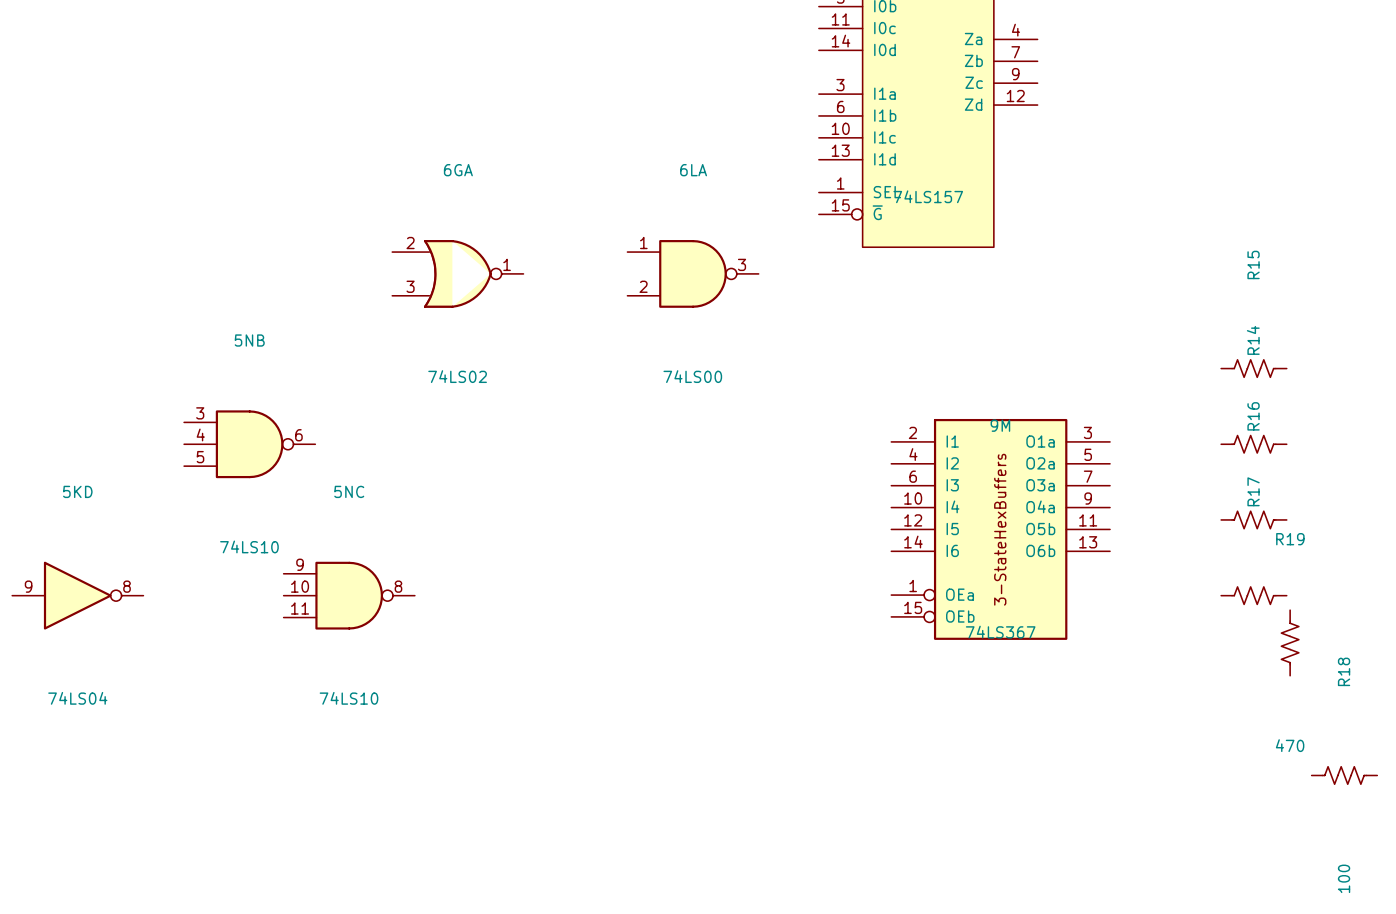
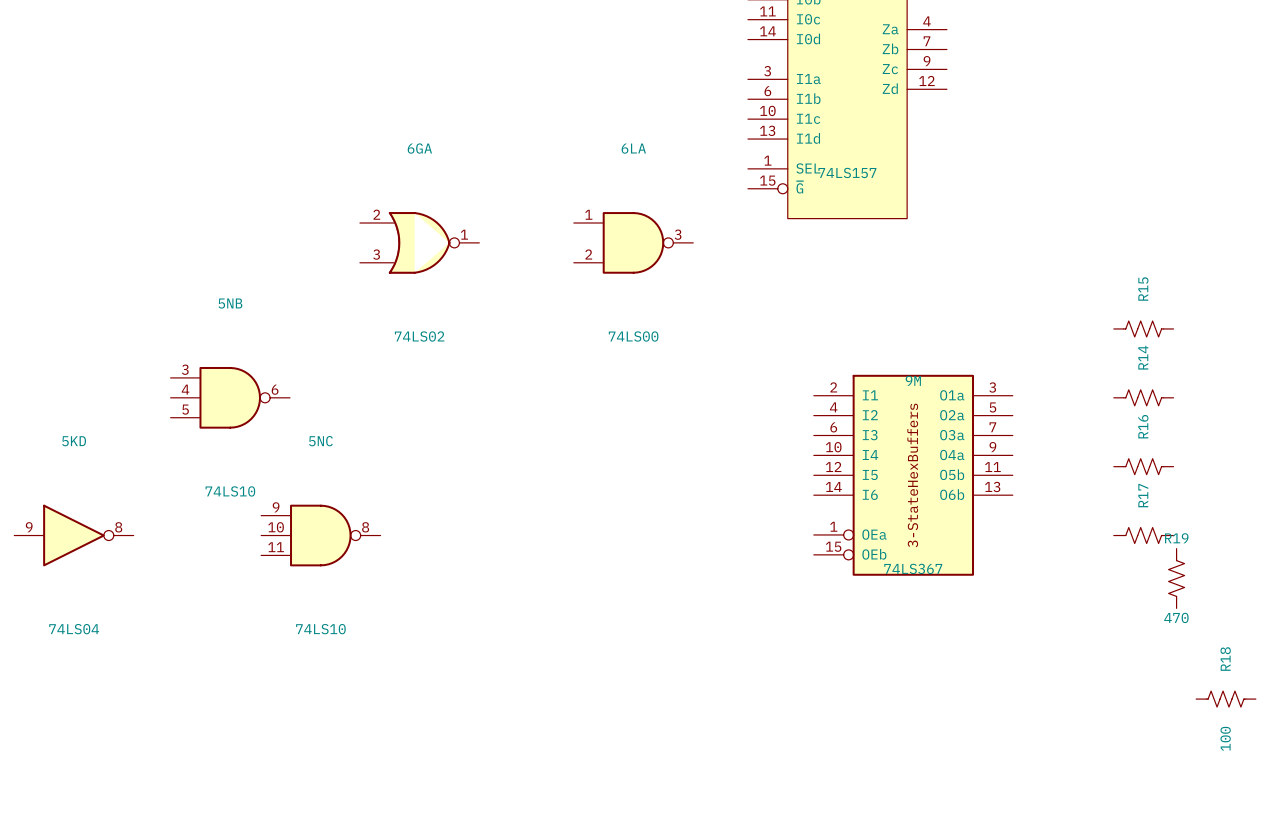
R15 name position: R15 (1253, 264) -> R15 (1143, 289)
R14 name position: R14 (1253, 340) -> R14 (1143, 357)
R16 name position: R16 (1253, 416) -> R16 (1143, 426)
R17 name position: R17 (1253, 491) -> R17 (1143, 495)
R19 name position: R19 (1290, 539) -> R19 (1176, 538)
R18 name position: R18 (1344, 671) -> R18 (1225, 659)
R19 value position: 470 (1290, 745) -> 470 (1176, 617)
R18 value position: 100 (1344, 878) -> 100 (1225, 738)

